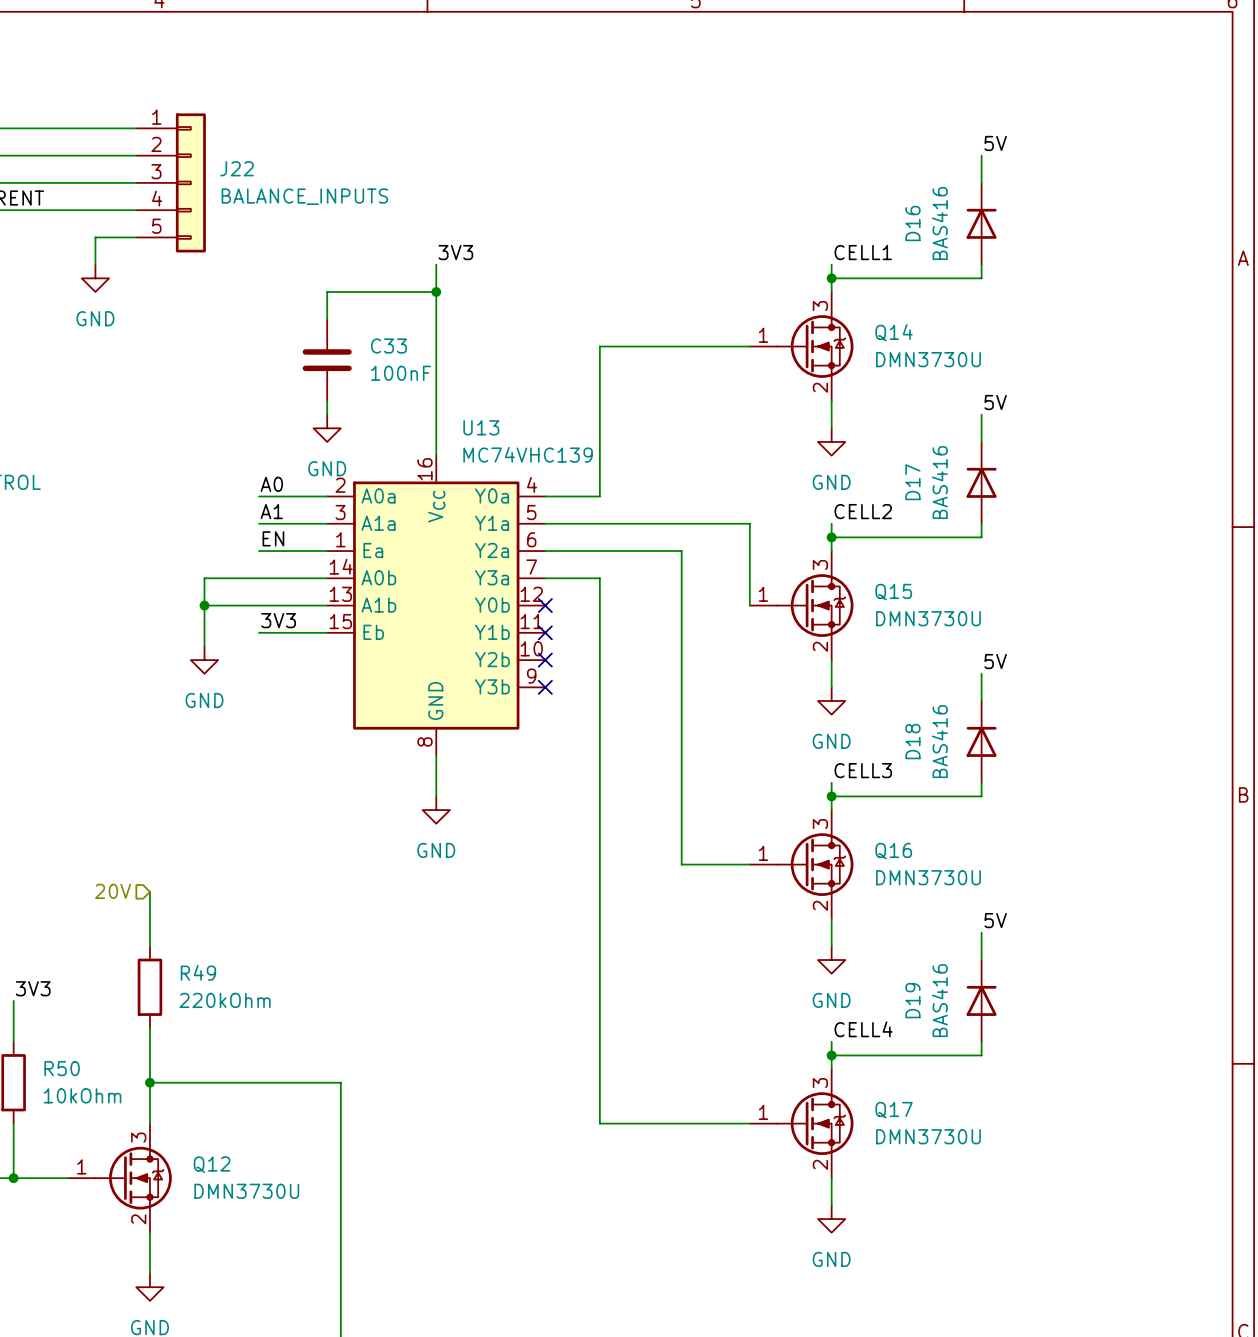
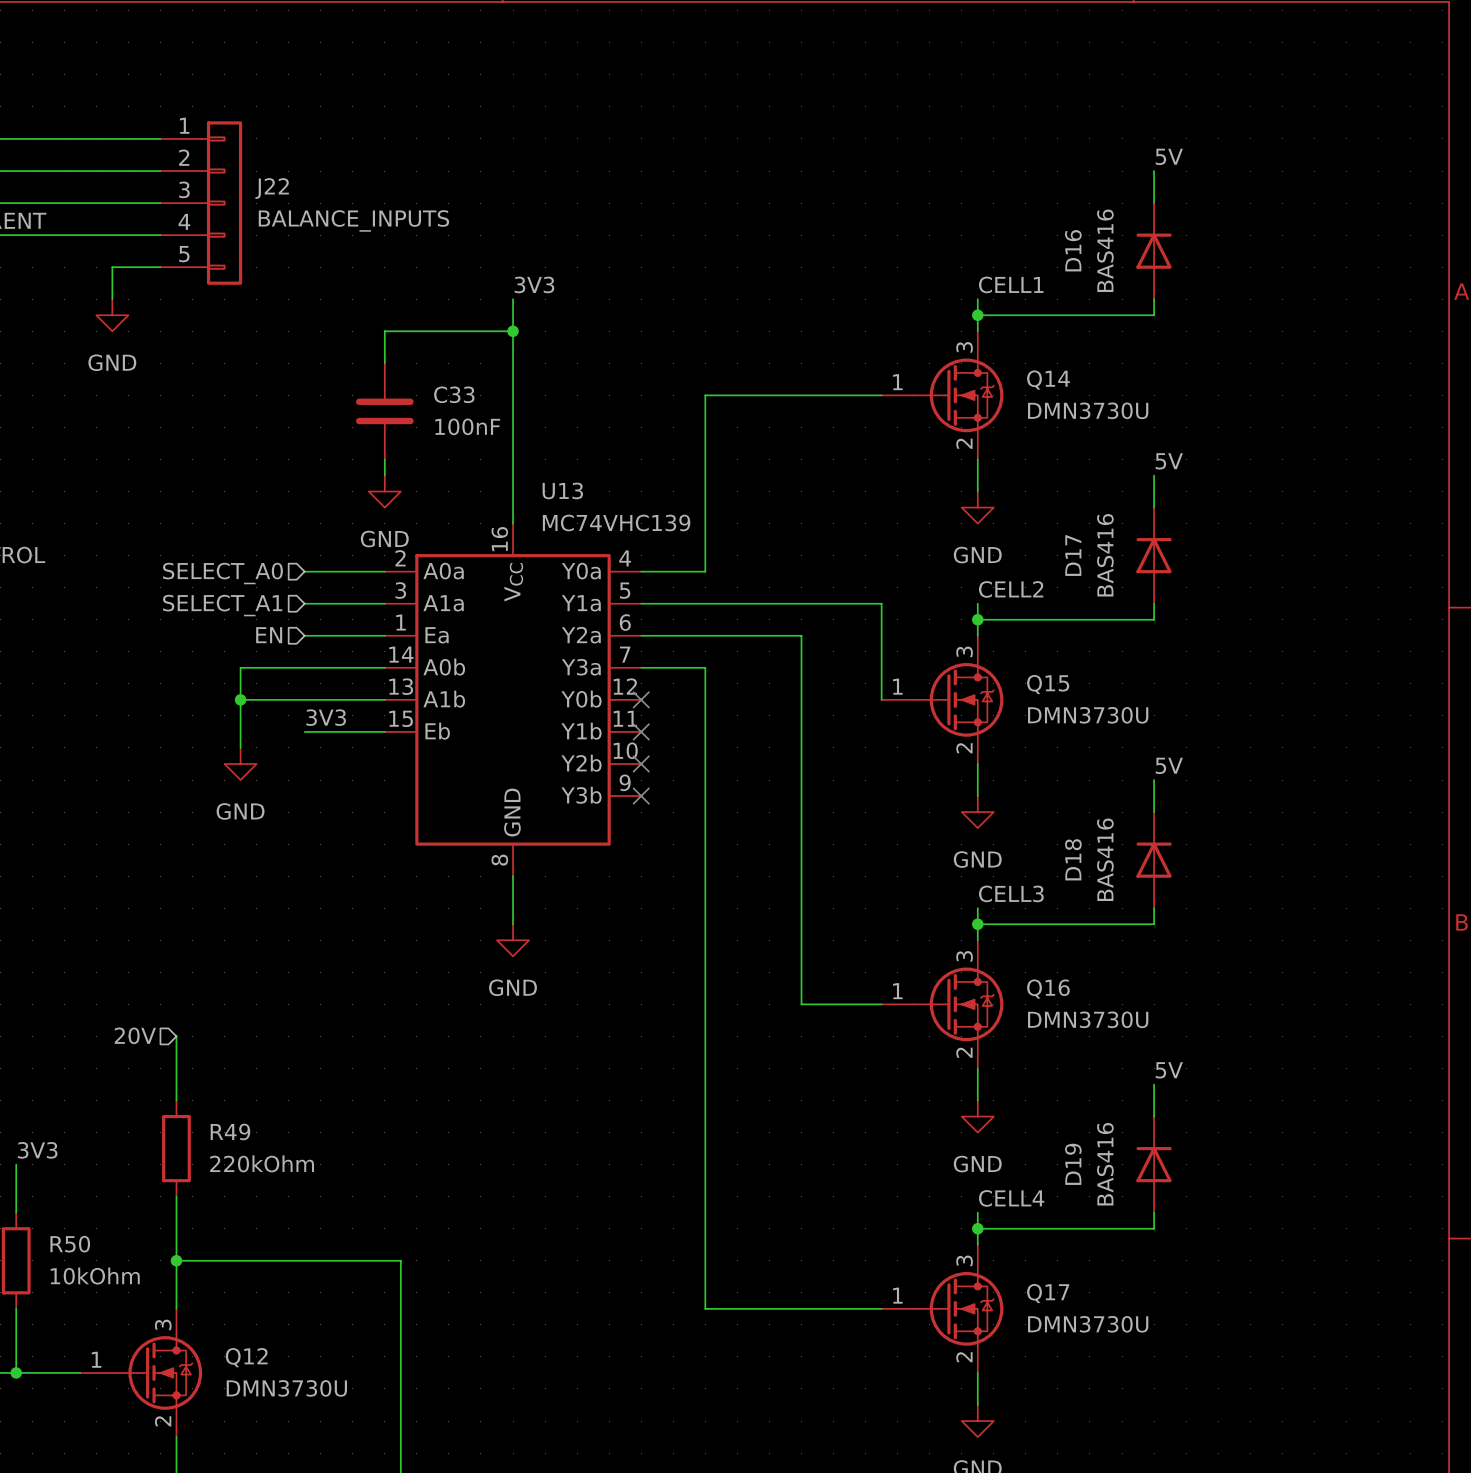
label: A0 (271, 484) -> none
hierarchical label: none -> SELECT_A0 (222, 573)
label: A1 (271, 511) -> none
hierarchical label: none -> SELECT_A1 (222, 605)
label: EN (273, 538) -> none
hierarchical label: none -> EN (269, 635)

